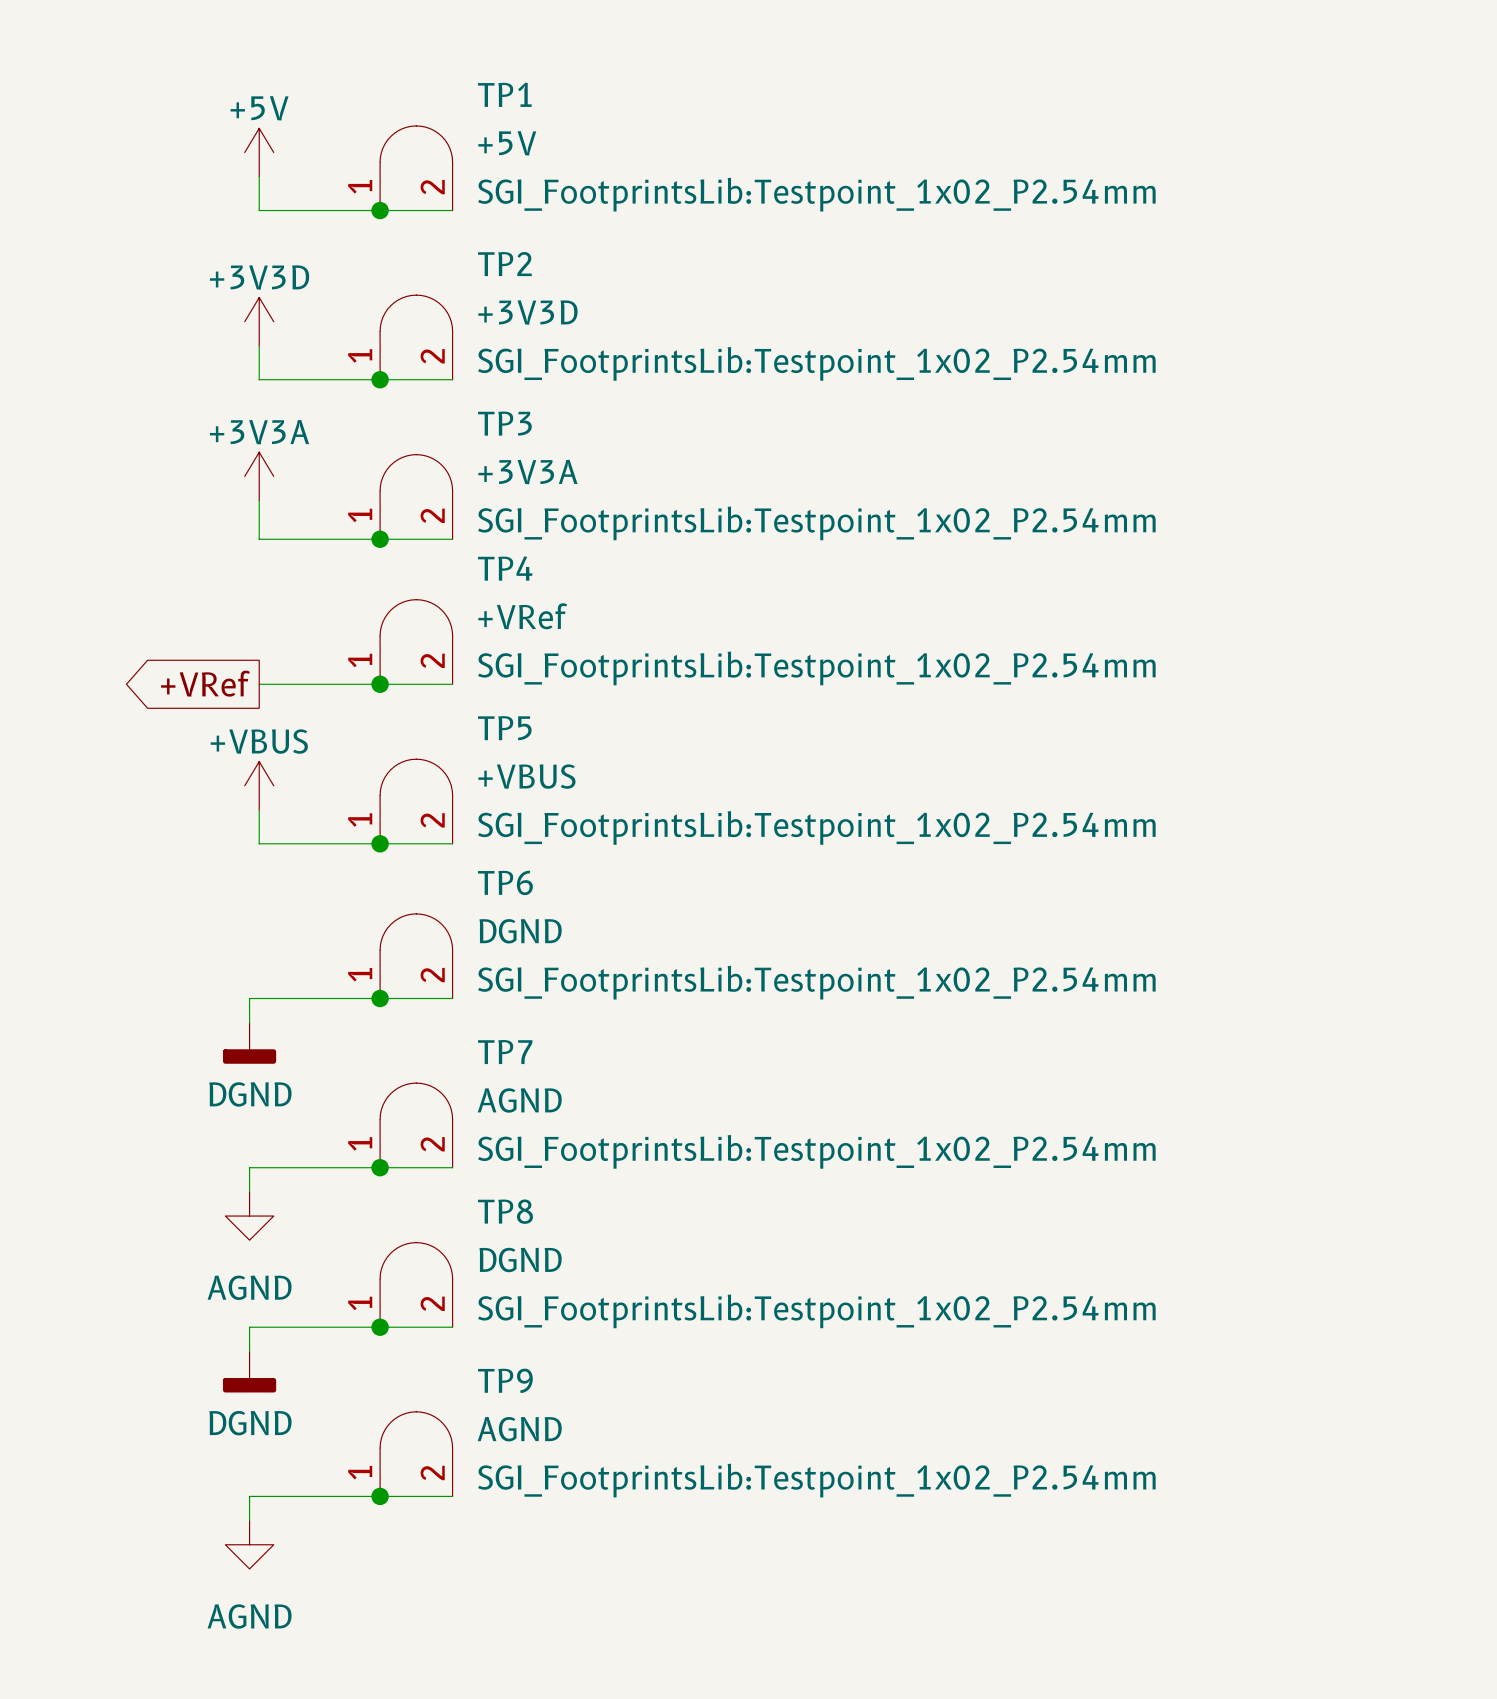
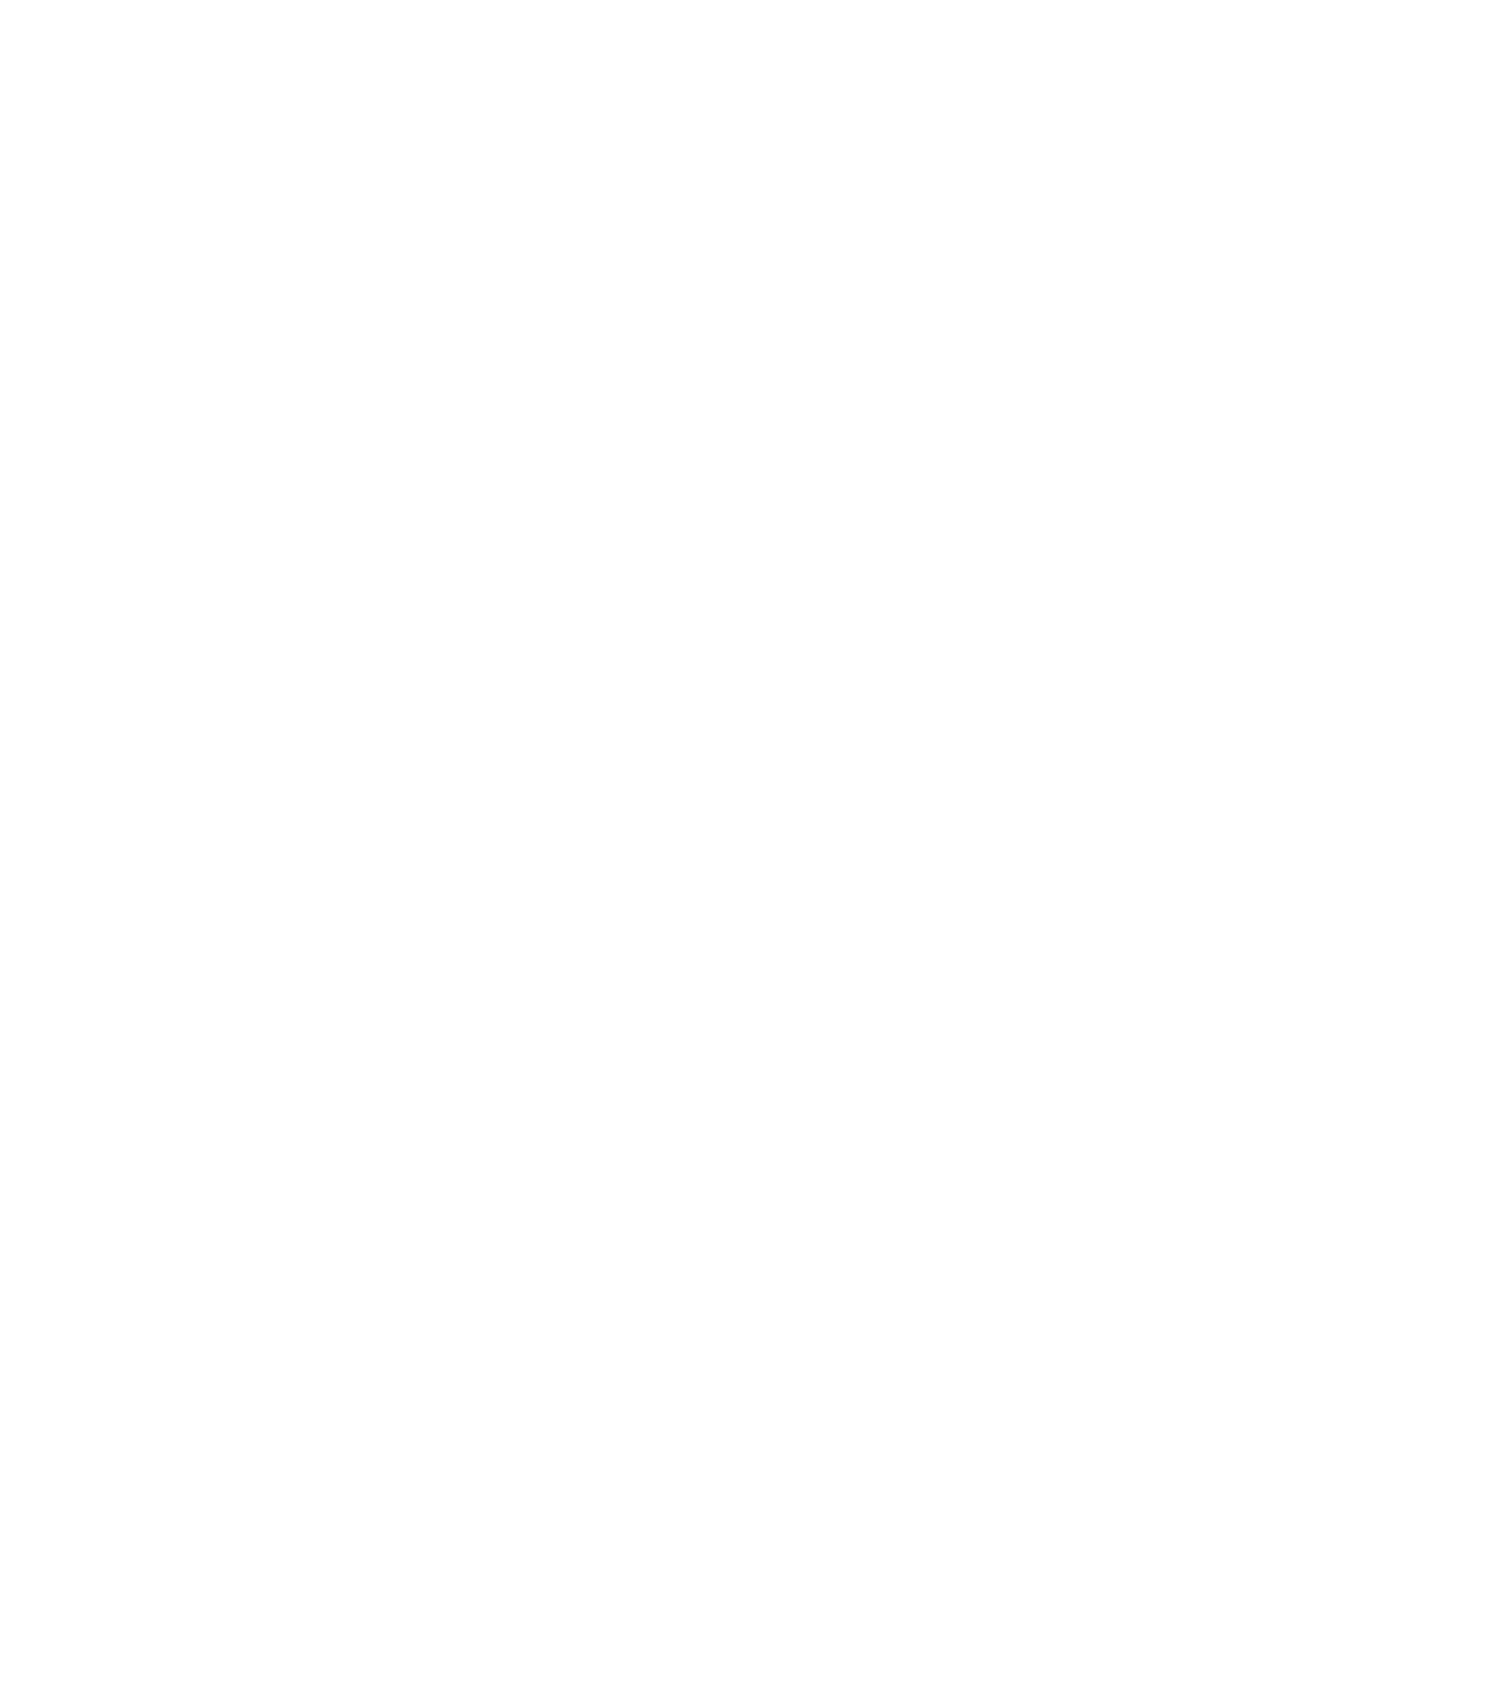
power symbol: +5V (259, 152) -> none
TP1: +5V (416, 168) -> none
wire: (259, 176) (259, 210) (452, 210) -> none
junction: (380, 210) -> none
power symbol: +3V3D (259, 321) -> none
TP2: +3V3D (416, 337) -> none
wire: (259, 345) (259, 379) (452, 379) -> none
junction: (380, 379) -> none
power symbol: +3V3A (259, 476) -> none
TP3: +3V3A (416, 496) -> none
wire: (259, 500) (259, 539) (452, 539) -> none
junction: (380, 539) -> none
TP4: +VRef (416, 641) -> none
global label: +VRef (205, 683) -> none
wire: (259, 684) (452, 684) -> none
junction: (380, 684) -> none
power symbol: +VBUS (259, 785) -> none
TP5: +VBUS (416, 801) -> none
wire: (259, 809) (259, 843) (452, 843) -> none
junction: (380, 843) -> none
TP6: DGND (416, 956) -> none
junction: (380, 998) -> none
wire: (452, 998) (249, 998) (249, 1022) -> none
power symbol: DGND (249, 1043) -> none
TP7: AGND (416, 1125) -> none
junction: (380, 1167) -> none
wire: (452, 1167) (249, 1167) (249, 1191) -> none
power symbol: AGND (249, 1216) -> none
TP8: DGND (416, 1284) -> none
junction: (380, 1327) -> none
wire: (452, 1327) (249, 1327) (249, 1351) -> none
power symbol: DGND (249, 1371) -> none
TP9: AGND (416, 1454) -> none
junction: (380, 1496) -> none
wire: (452, 1496) (249, 1496) (249, 1520) -> none
power symbol: AGND (249, 1544) -> none

